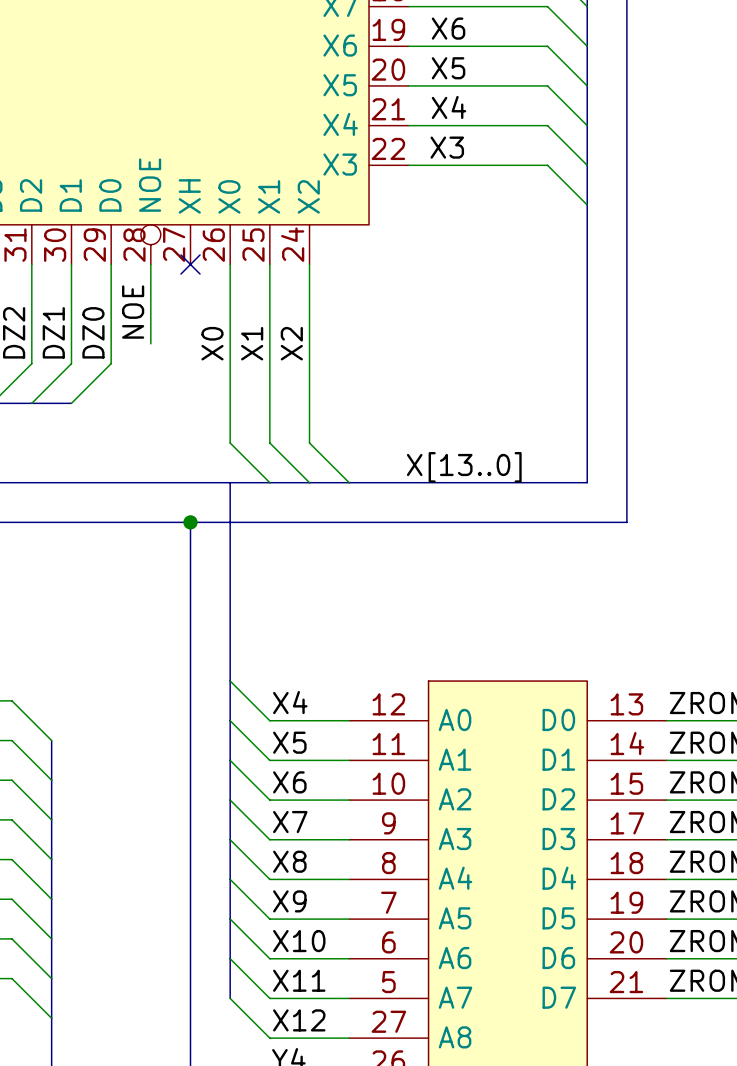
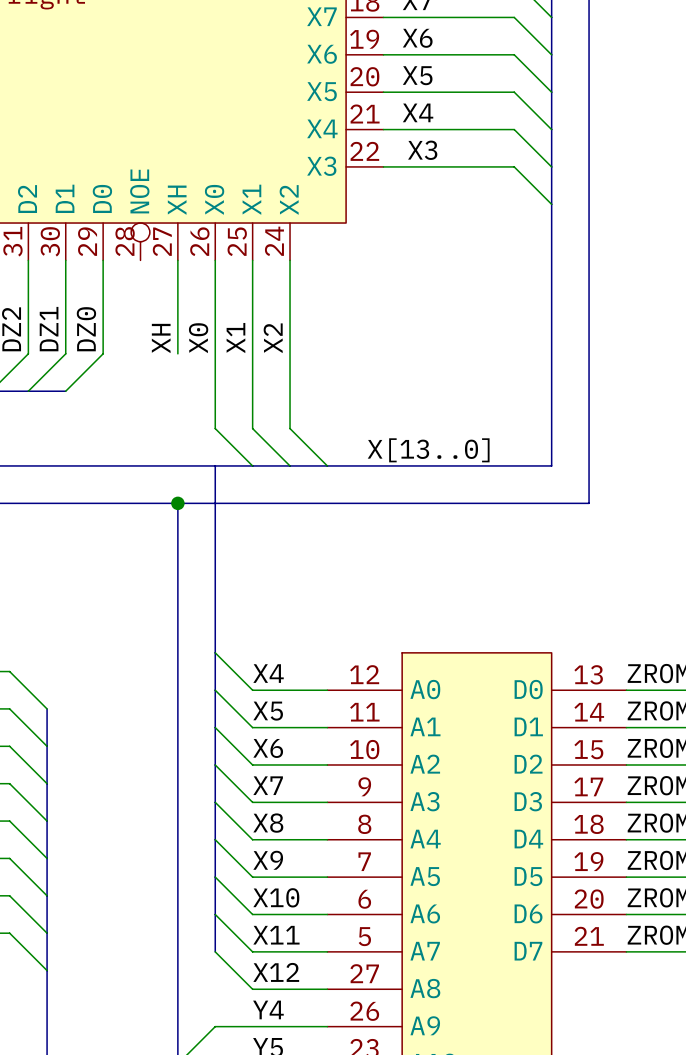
wire: (150, 264) (150, 343) -> none
wire: none -> (177, 260) (177, 353)
no-connect mark: (190, 264) -> none
label: NOE (133, 312) -> none
label: none -> XH (161, 338)

